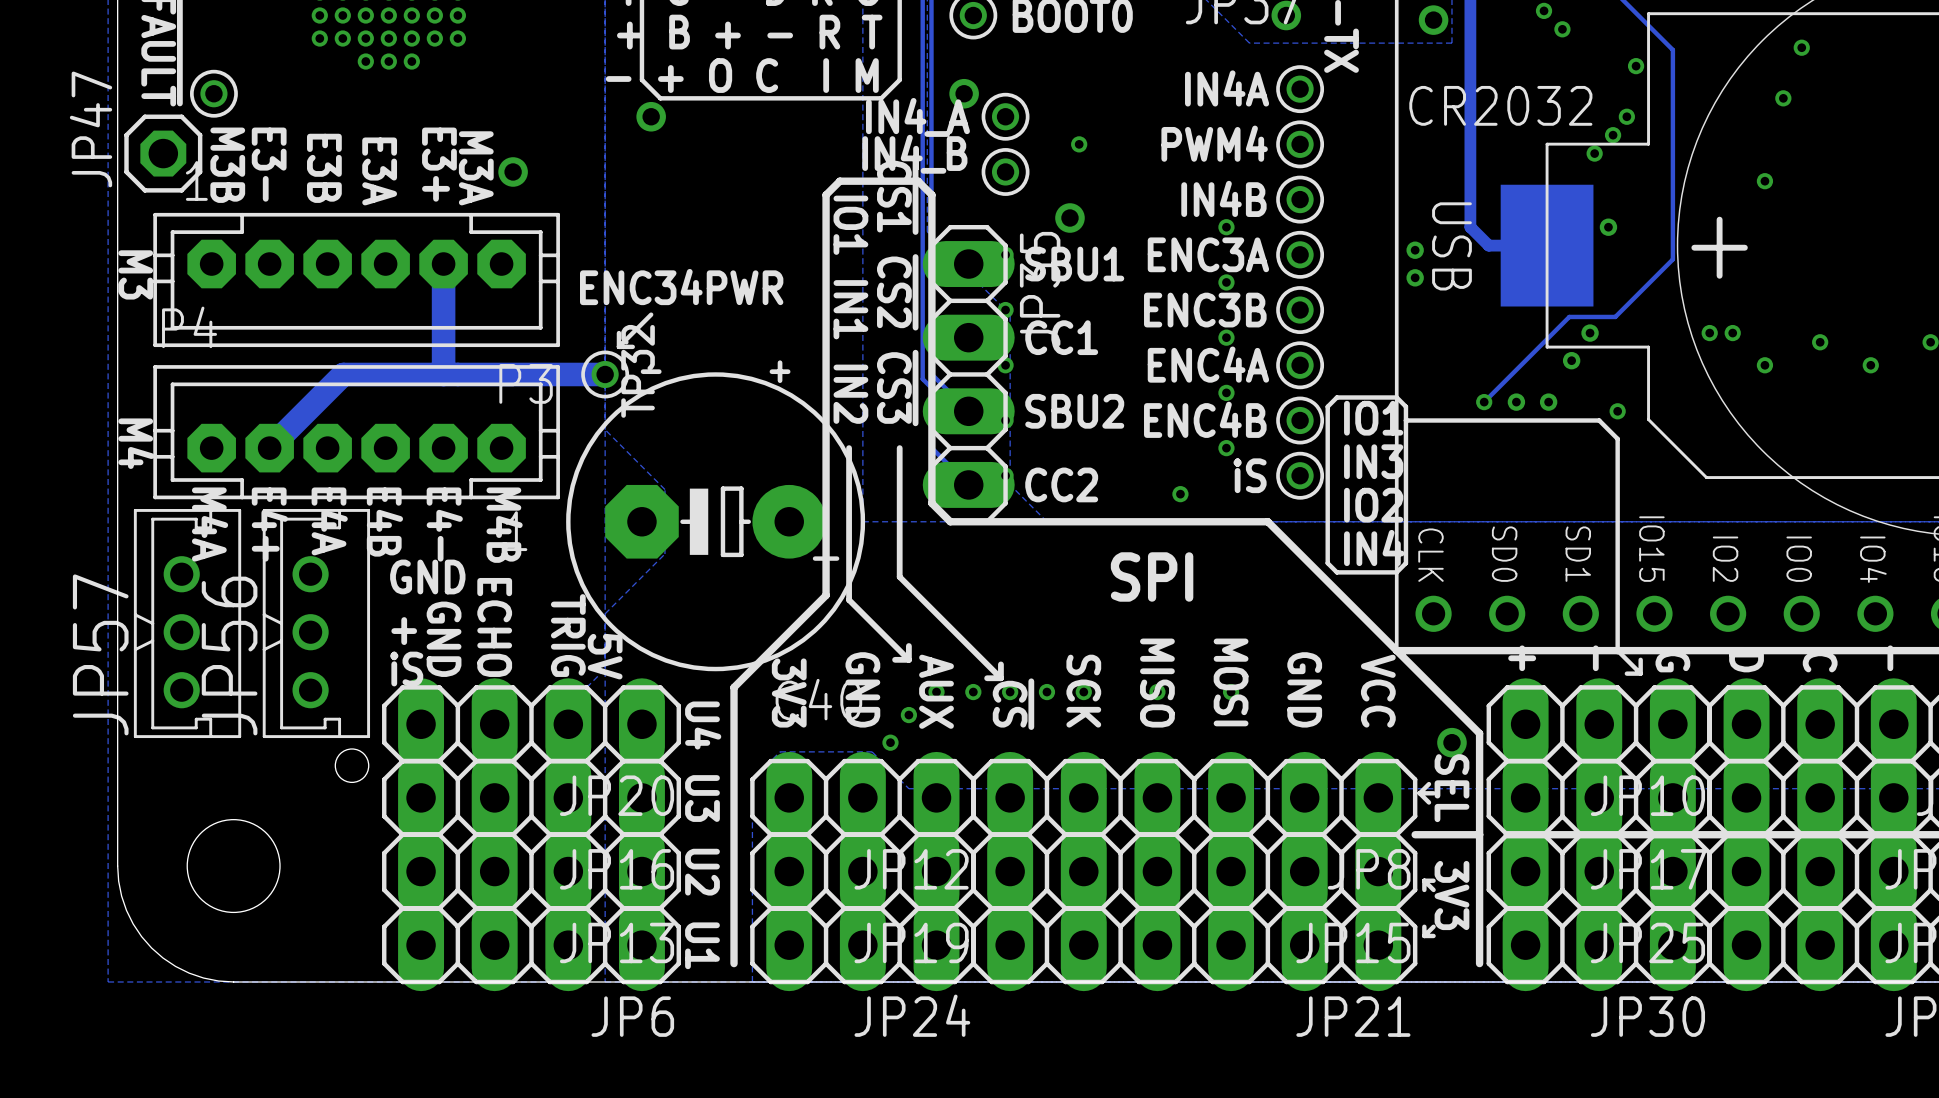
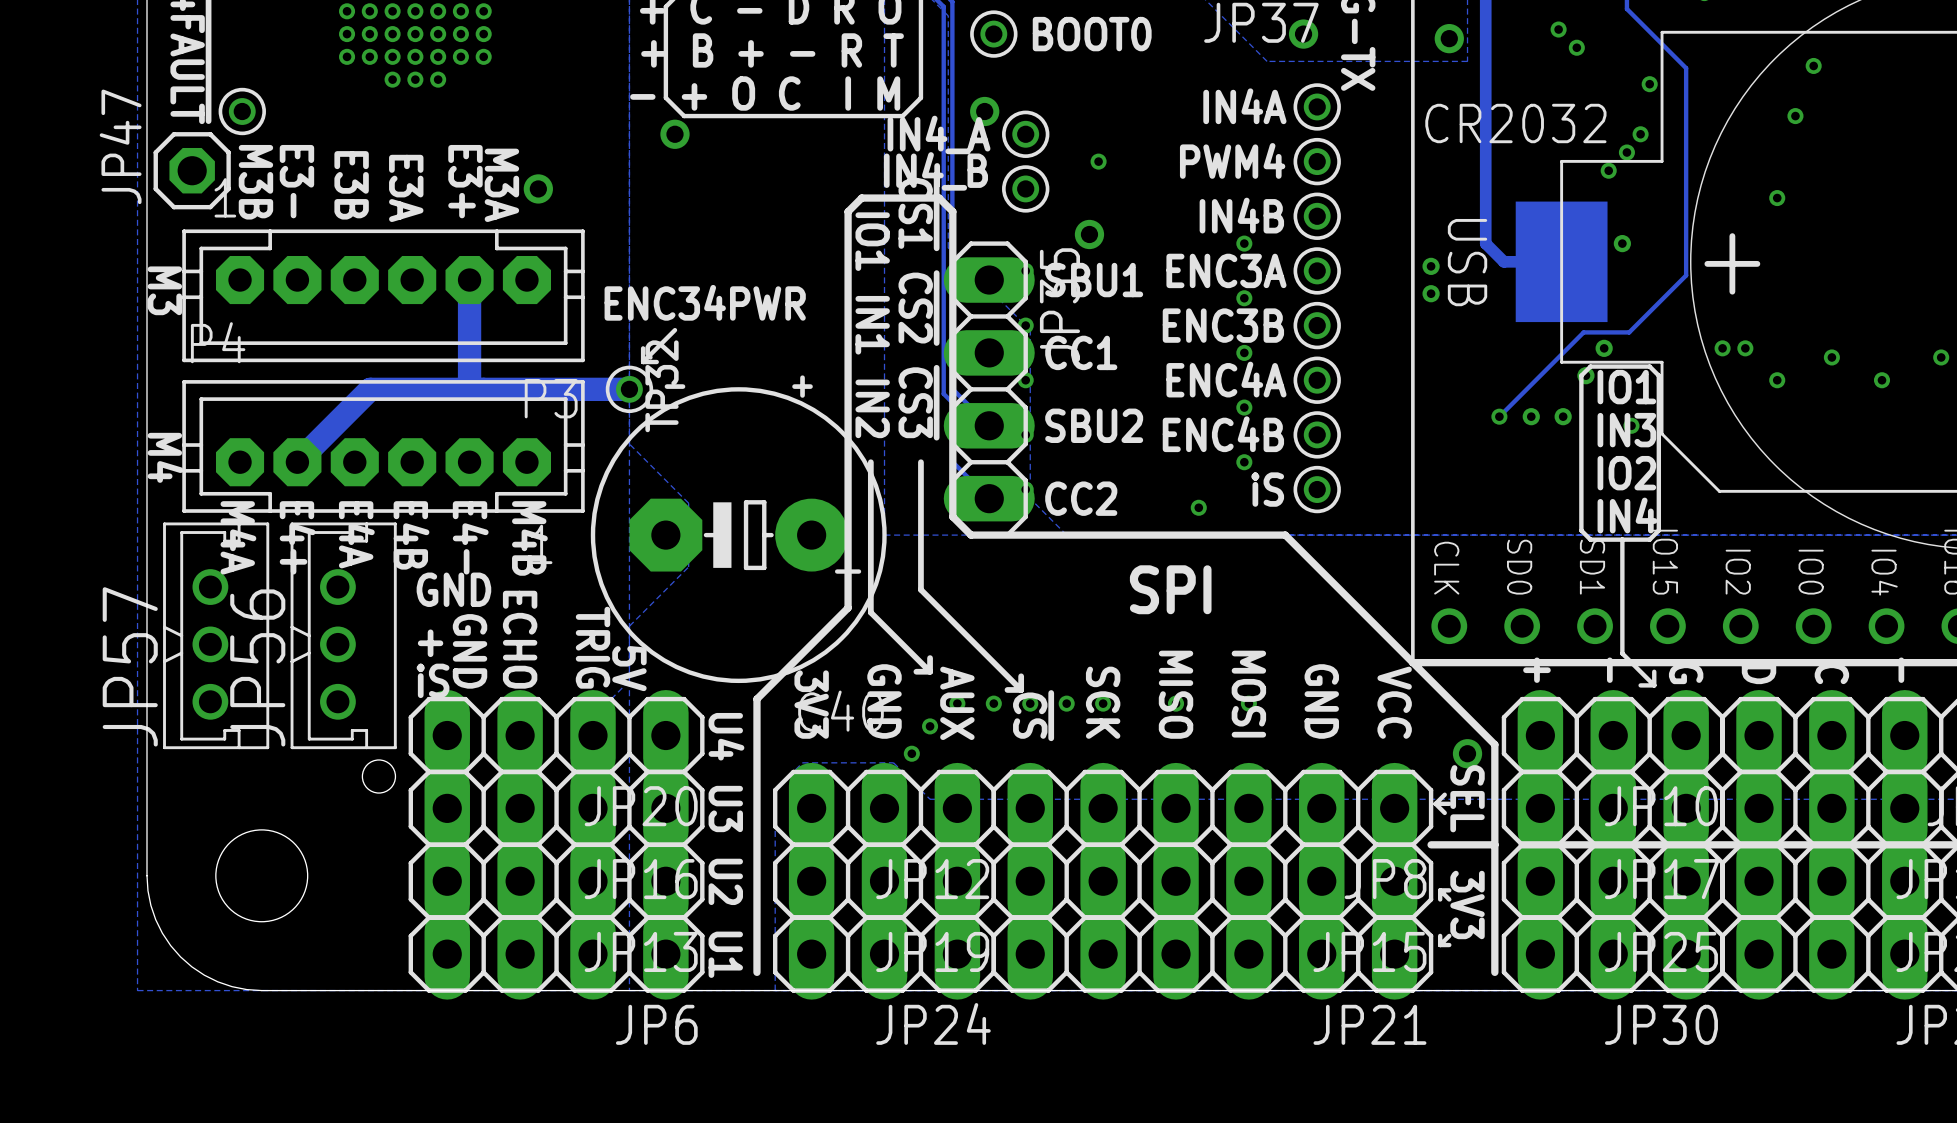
line: (1396, 397) (1405, 406) (1405, 563) (1396, 572) (1336, 572) (1327, 563) (1327, 406) (1336, 397) (1396, 397) -> (1649, 366) (1658, 375) (1658, 530) (1649, 539) (1590, 539) (1581, 530) (1581, 375) (1590, 366) (1649, 366)
text position: IO1 (1373, 418) -> IO1 (1626, 387)
line: (1405, 420) (1599, 420) (1617, 438) (1617, 650) -> (1622, 539) (1622, 653) (1631, 662)
text position: IN3 (1373, 461) -> IN3 (1626, 430)
text position: IO2 (1373, 505) -> IO2 (1626, 473)
text position: IN4 (1374, 547) -> IN4 (1627, 515)

